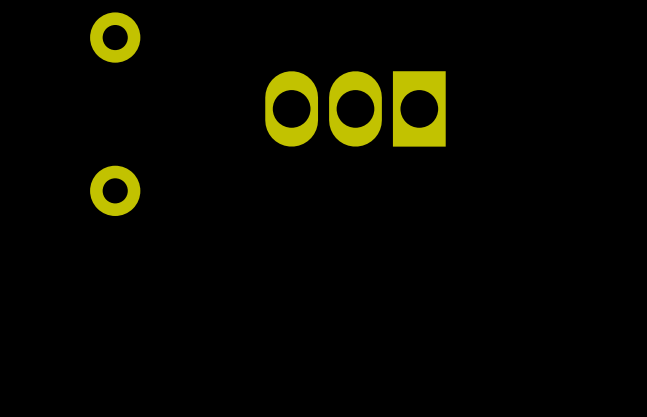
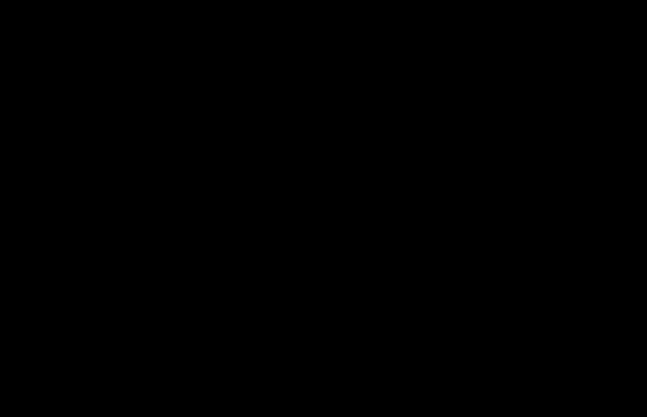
part: (115, 37) -> none
part: (355, 108) -> none
part: (115, 190) -> none

